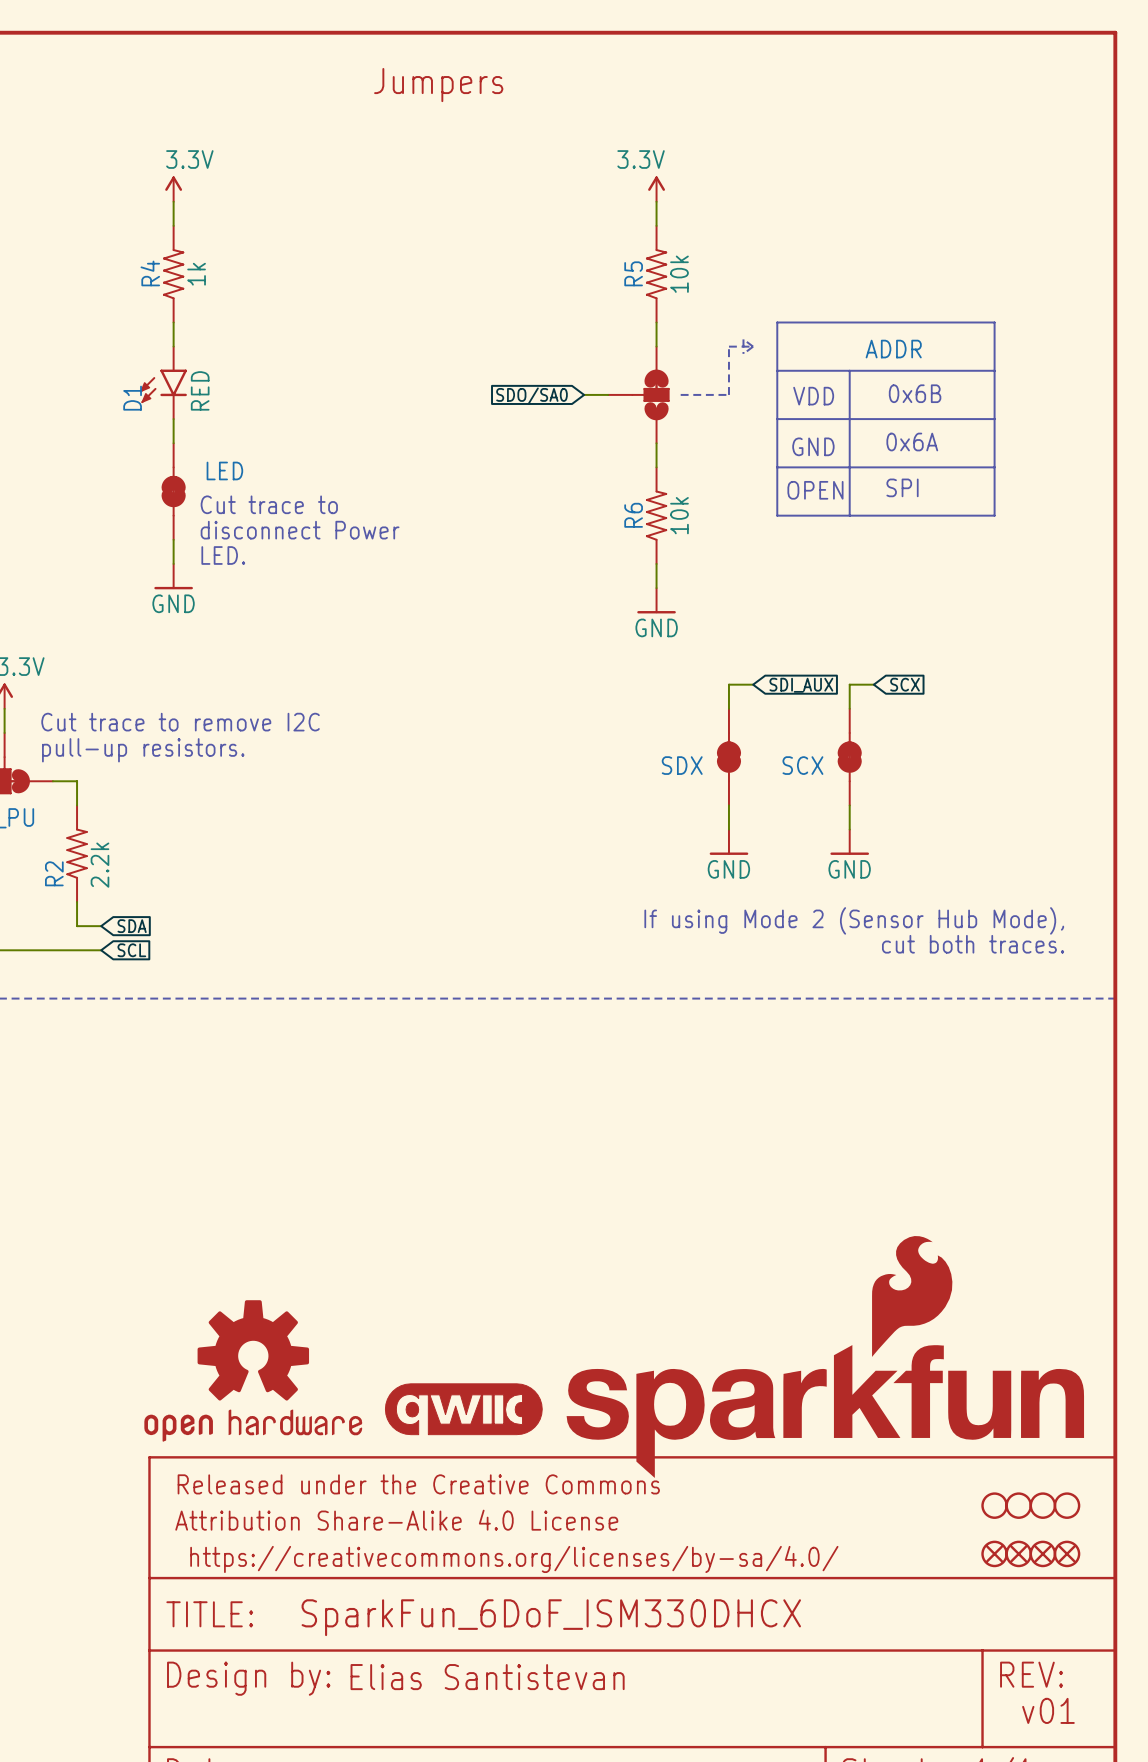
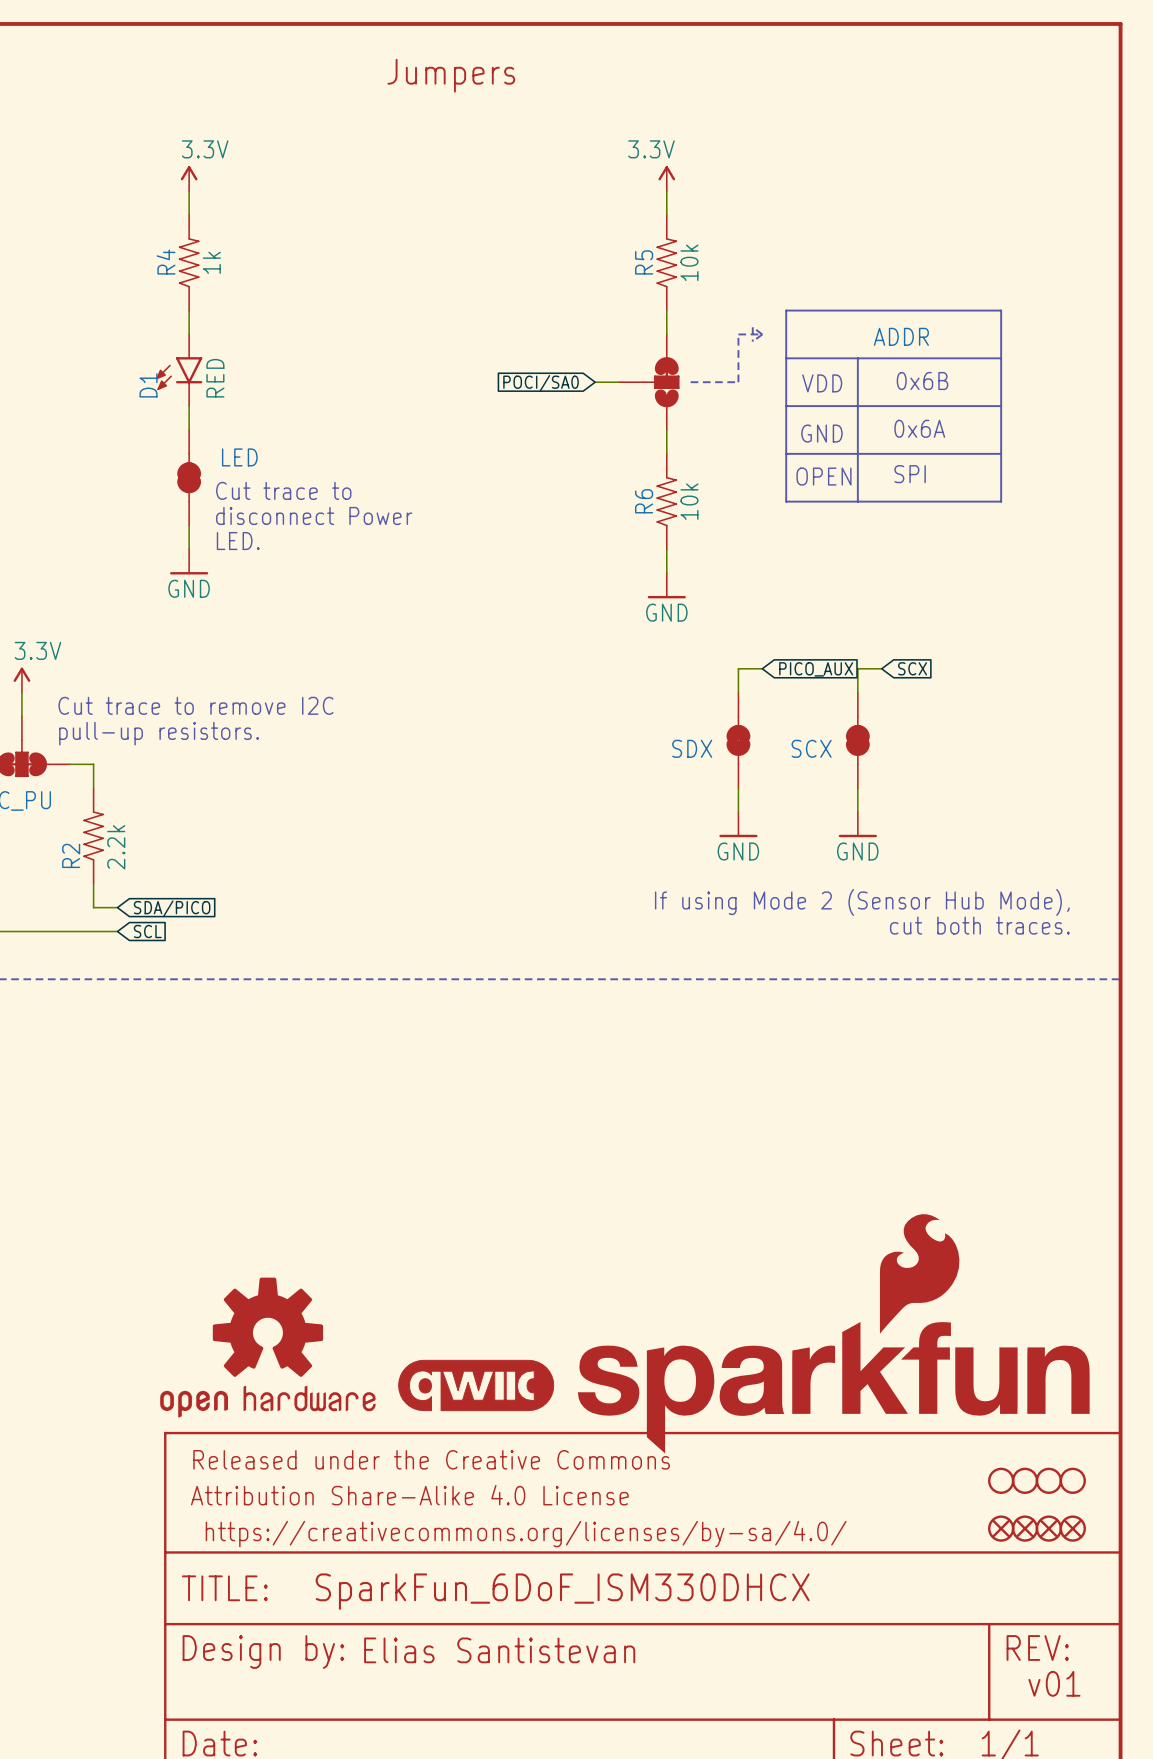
global label: SDO/SA0 (531, 396) -> POCI/SA0 (541, 383)
global label: SDI_AUX (801, 685) -> PICO_AUX (816, 669)
global label: SDA (132, 926) -> SDA/PICO (172, 908)

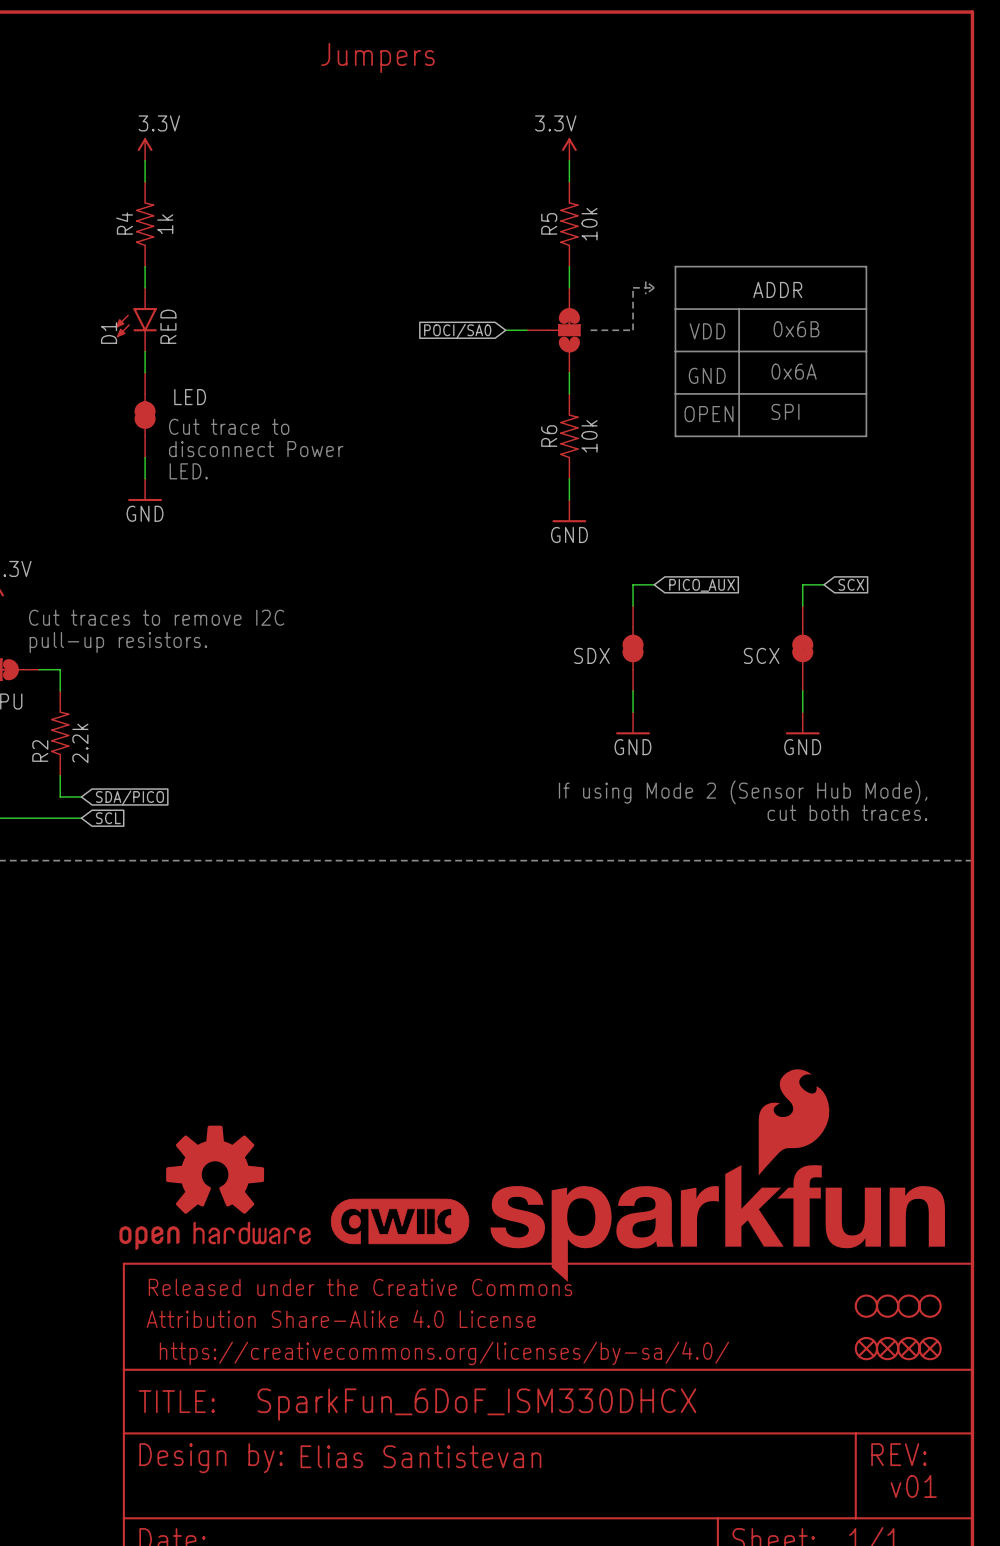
wire: (881, 668) (857, 668) (857, 692) -> (823, 584) (802, 584) (802, 606)
global label position: SCX (912, 668) -> SCX (851, 584)
text: Cut trace to remove I2C (195, 705) -> Cut traces to remove I2C (156, 617)
SCX position: (857, 740) -> (802, 648)
wire: (857, 788) (857, 812) -> (802, 690) (802, 712)
power symbol position: GND (857, 824) -> GND (802, 723)

